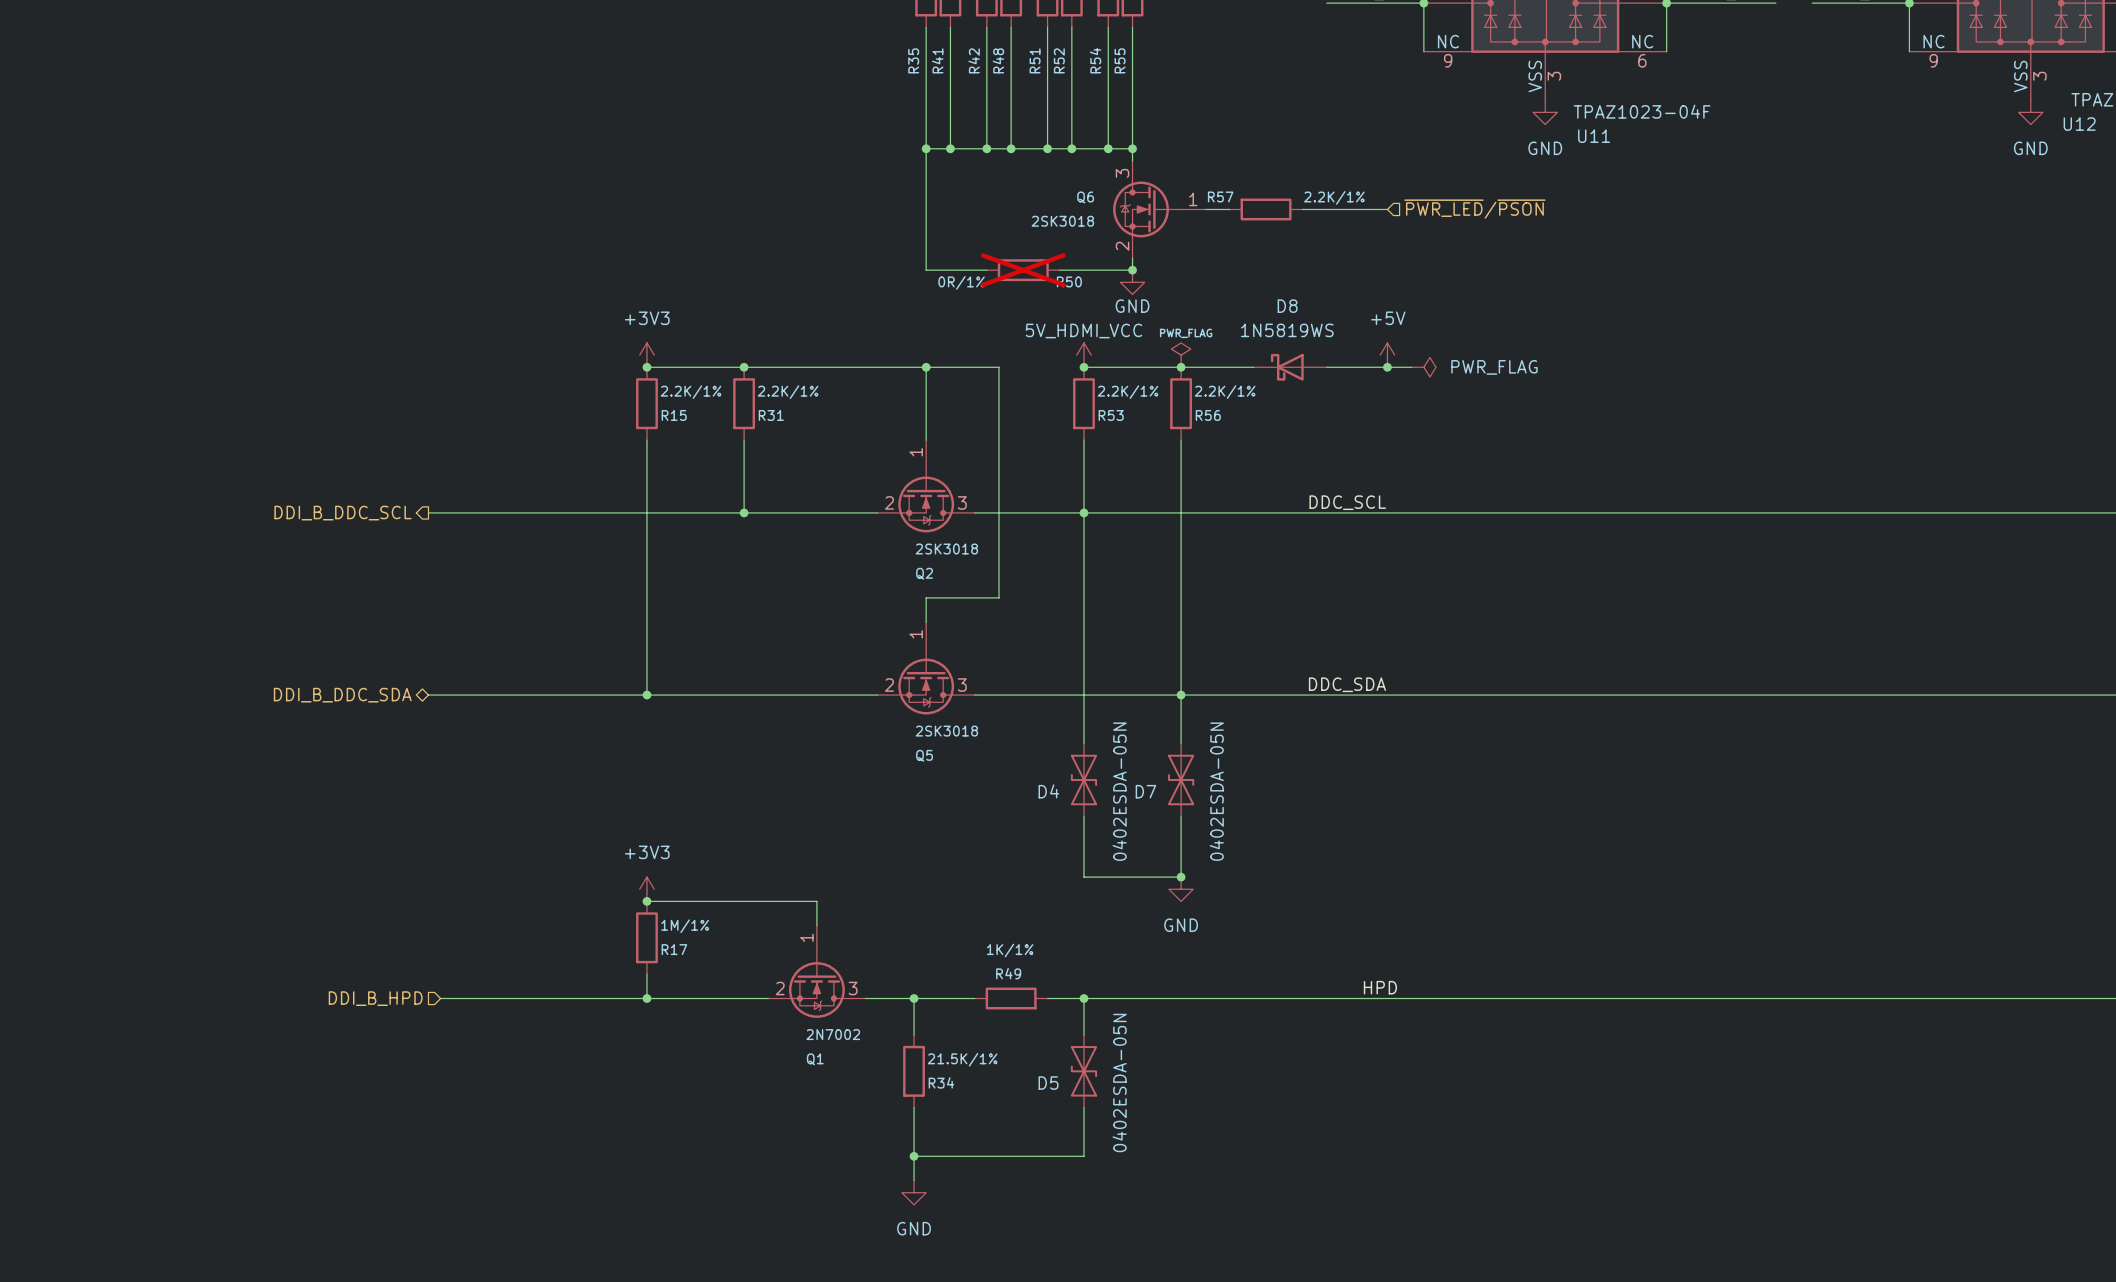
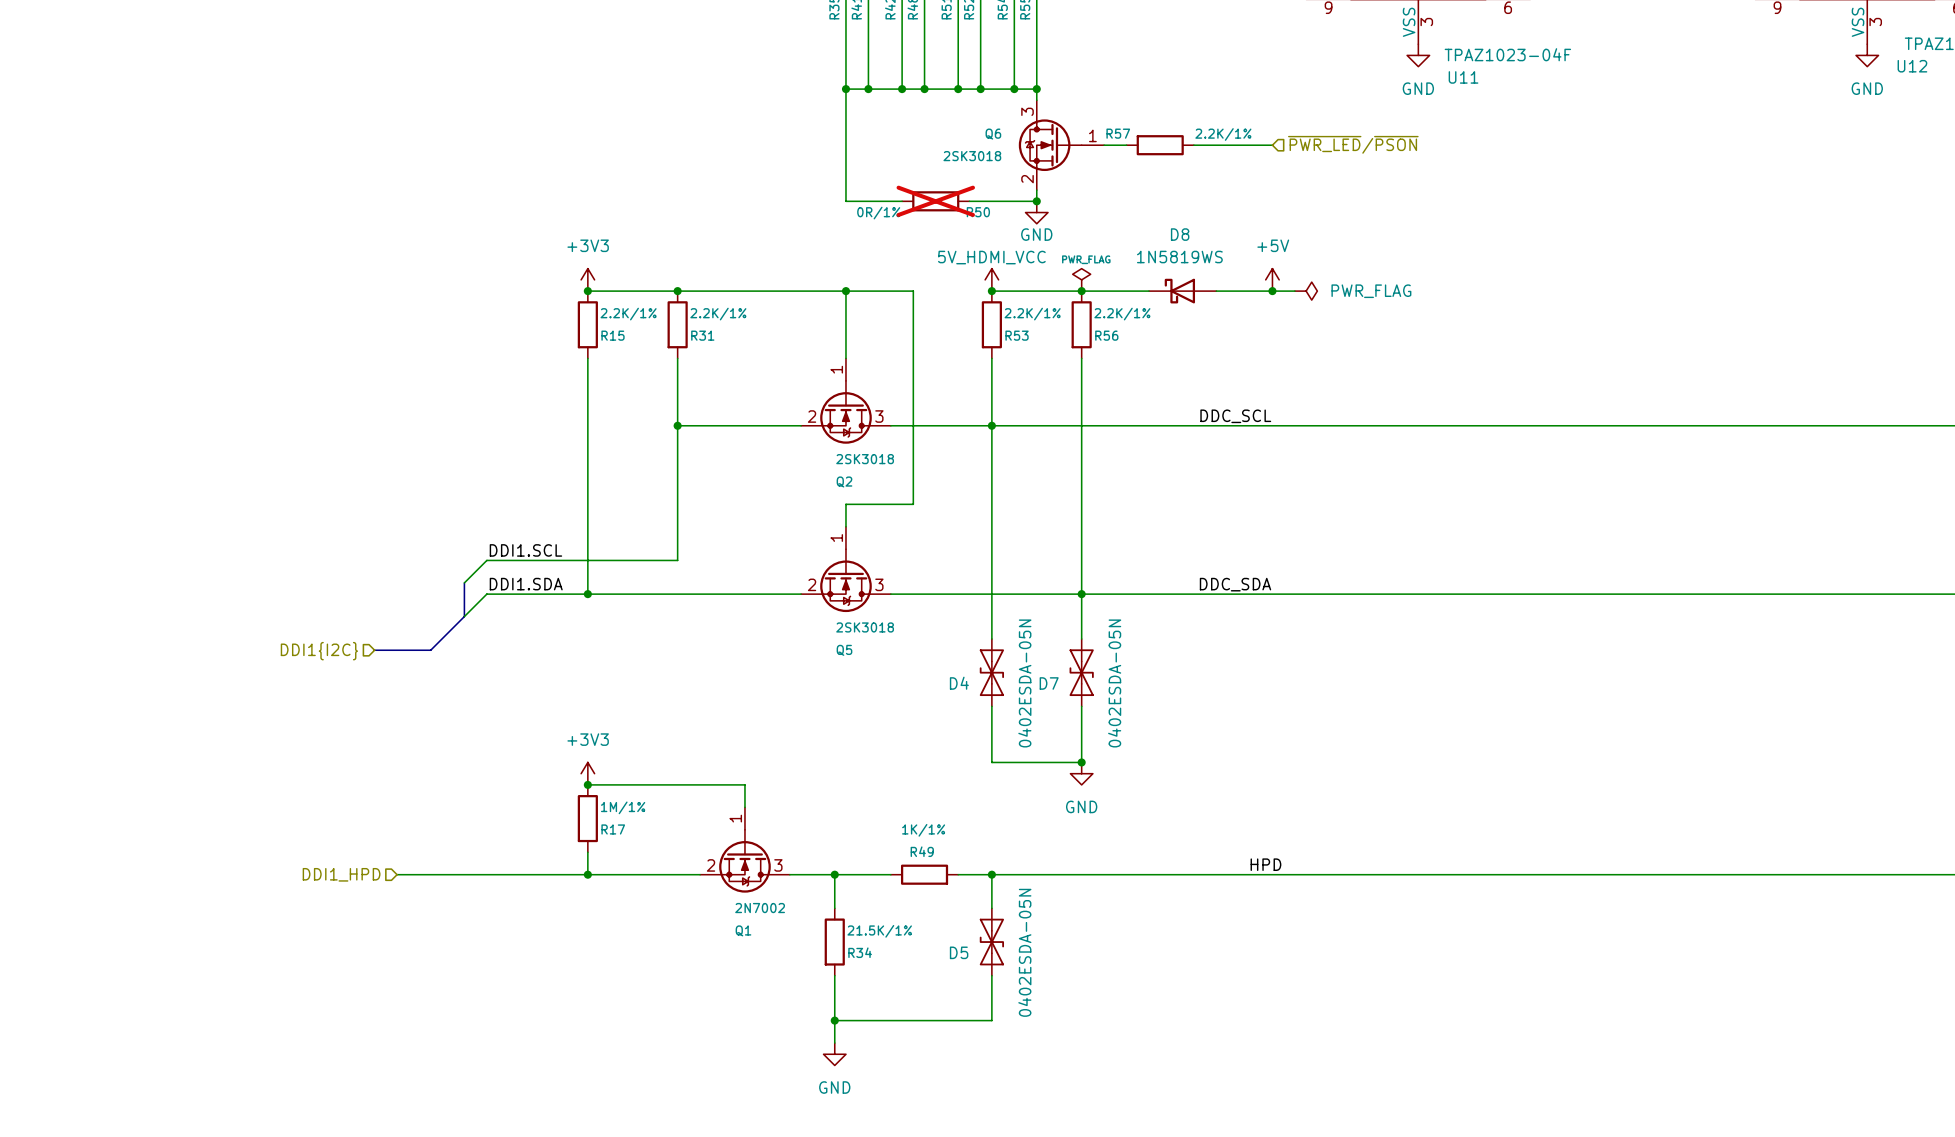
wire: (428, 512) (744, 512) -> (464, 582) (486, 560) (677, 560) (677, 425)
hierarchical label: DDI_B_DDC_SCL (343, 513) -> none
label: none -> DDI1.SCL (525, 550)
bus: none -> (464, 582) (464, 616) (430, 650) (374, 650)
label: none -> DDI1.SDA (526, 584)
hierarchical label: DDI_B_DDC_SDA (342, 695) -> none
wire: (428, 695) (537, 695) -> (464, 616) (486, 594)
hierarchical label: none -> DDI1{I2C} (319, 651)
hierarchical label: DDI_B_HPD (375, 998) -> DDI1_HPD (341, 874)

